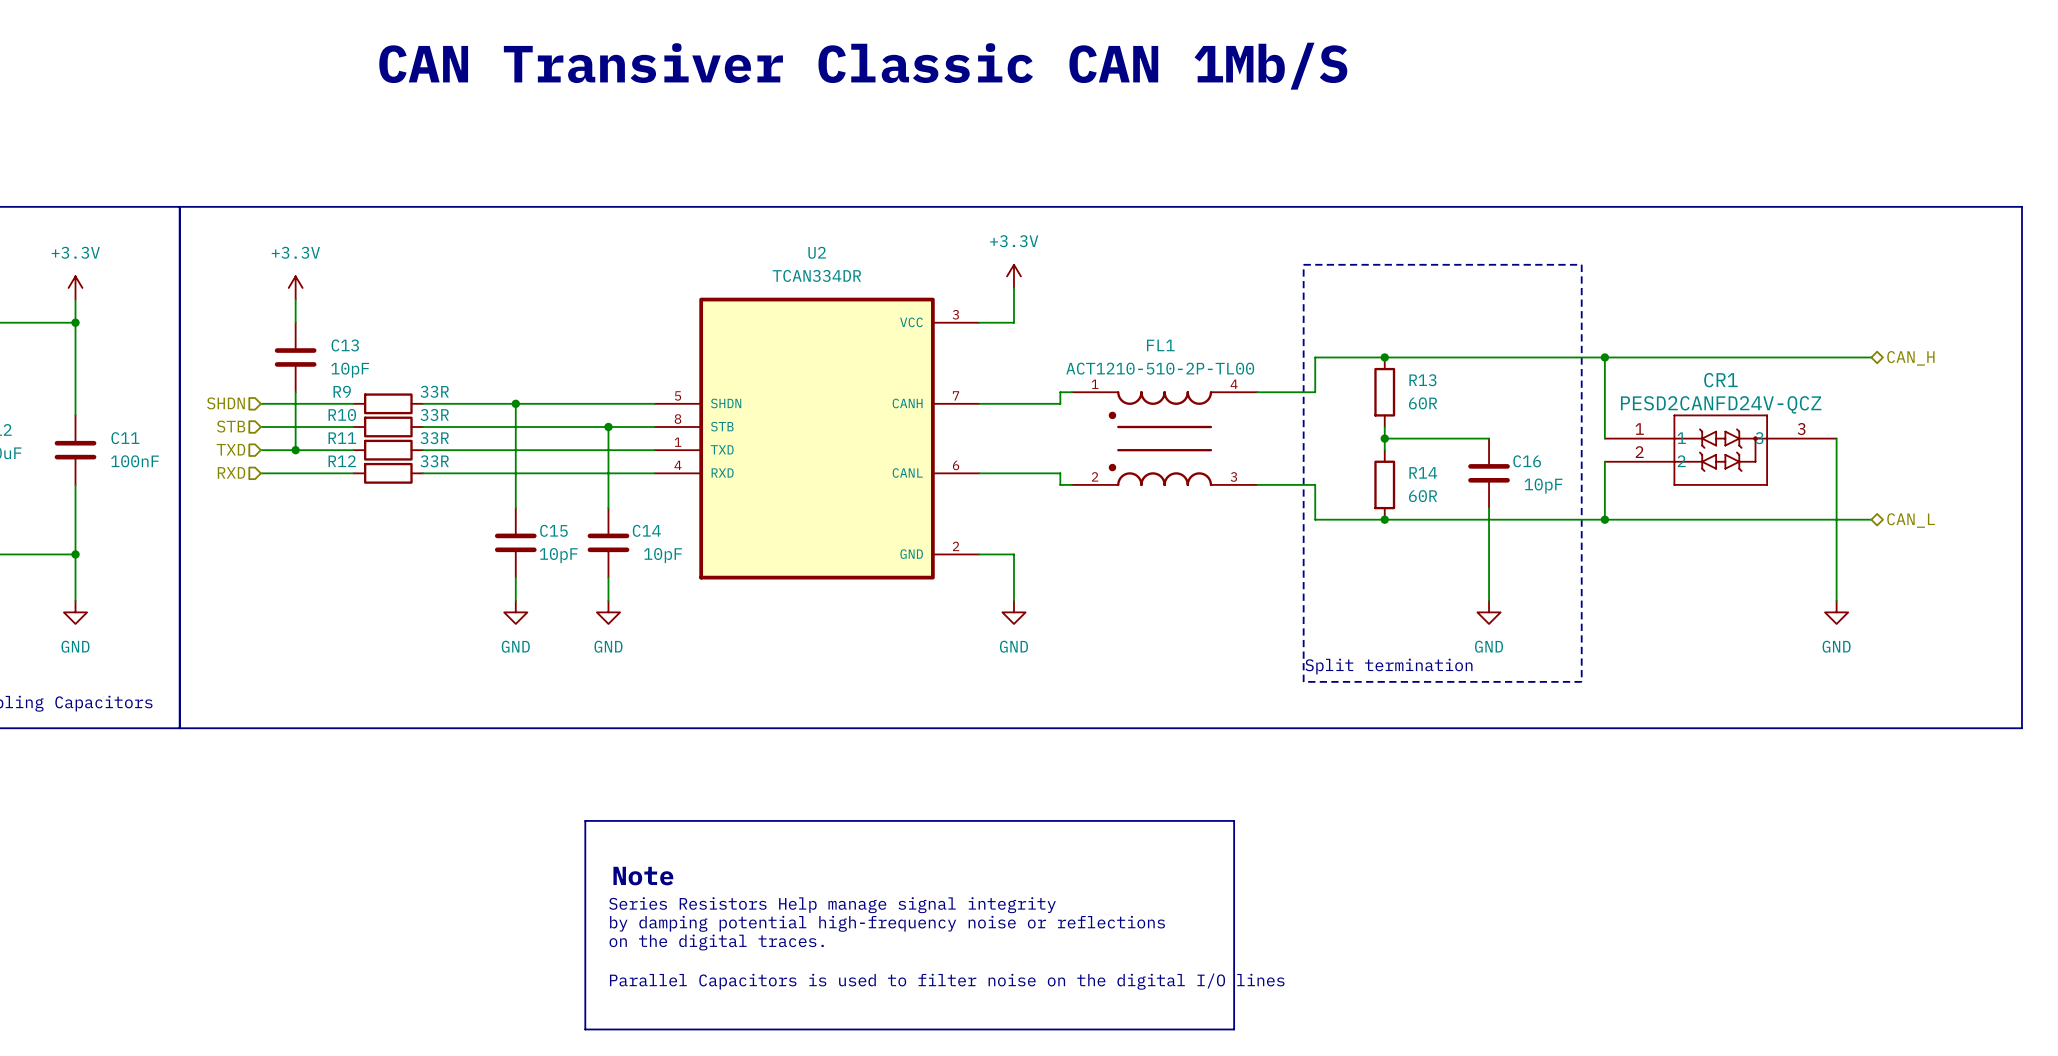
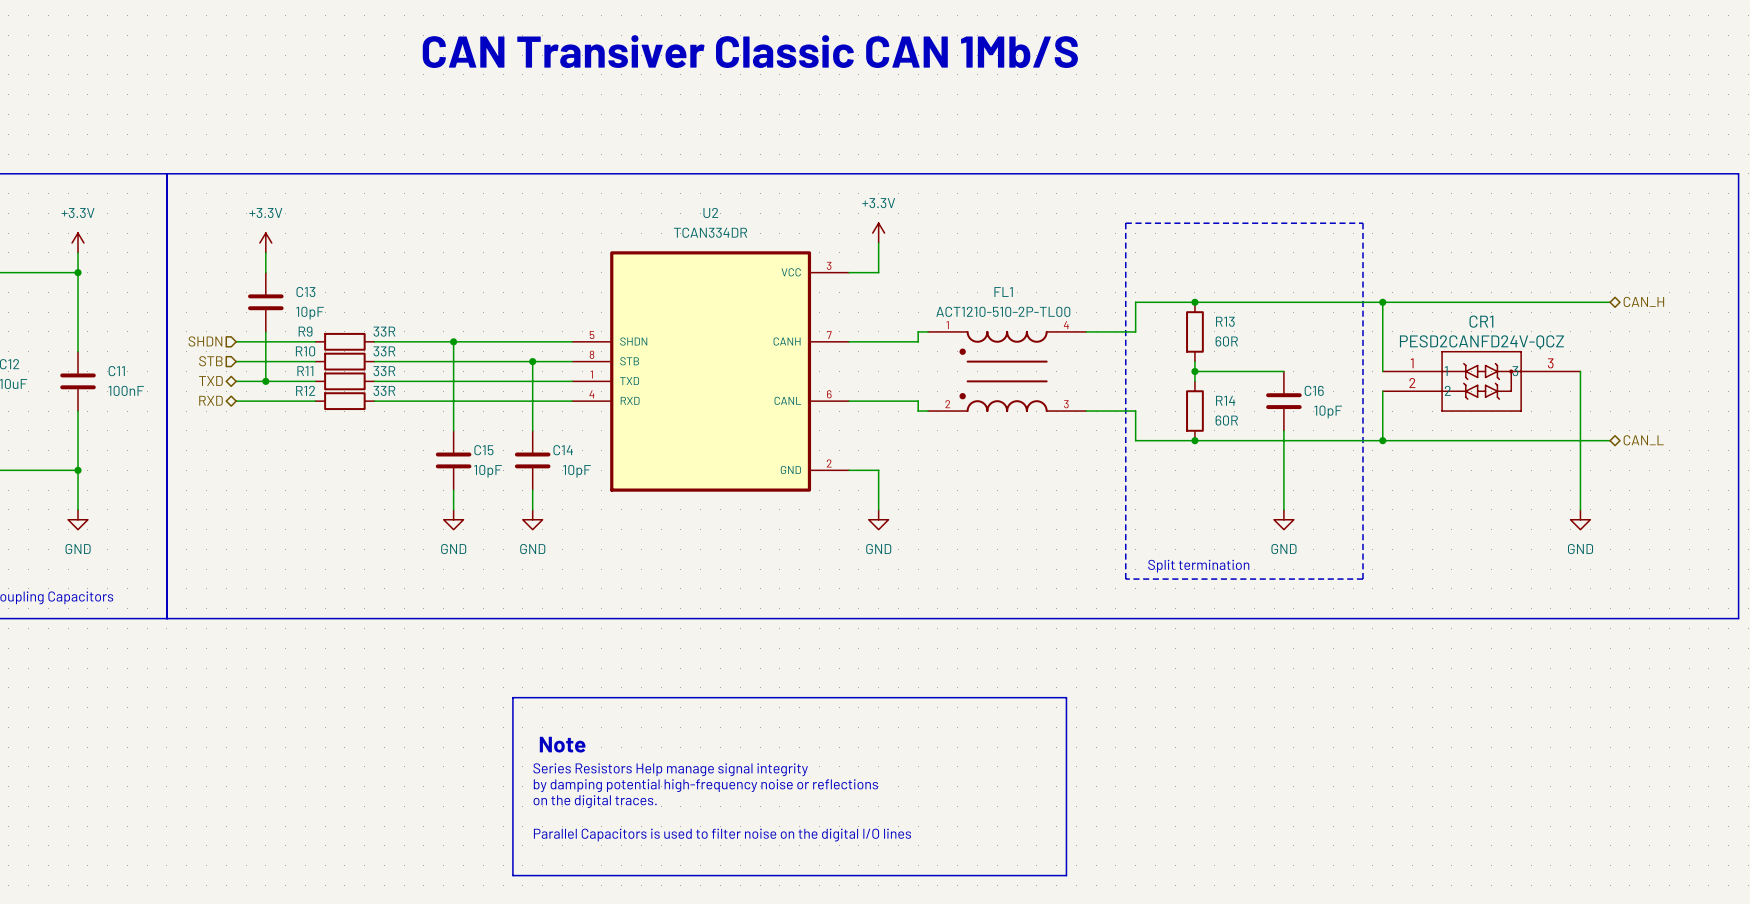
hierarchical label shape: input (230, 449) -> bidirectional (210, 381)
hierarchical label shape: input (231, 472) -> bidirectional (210, 400)

